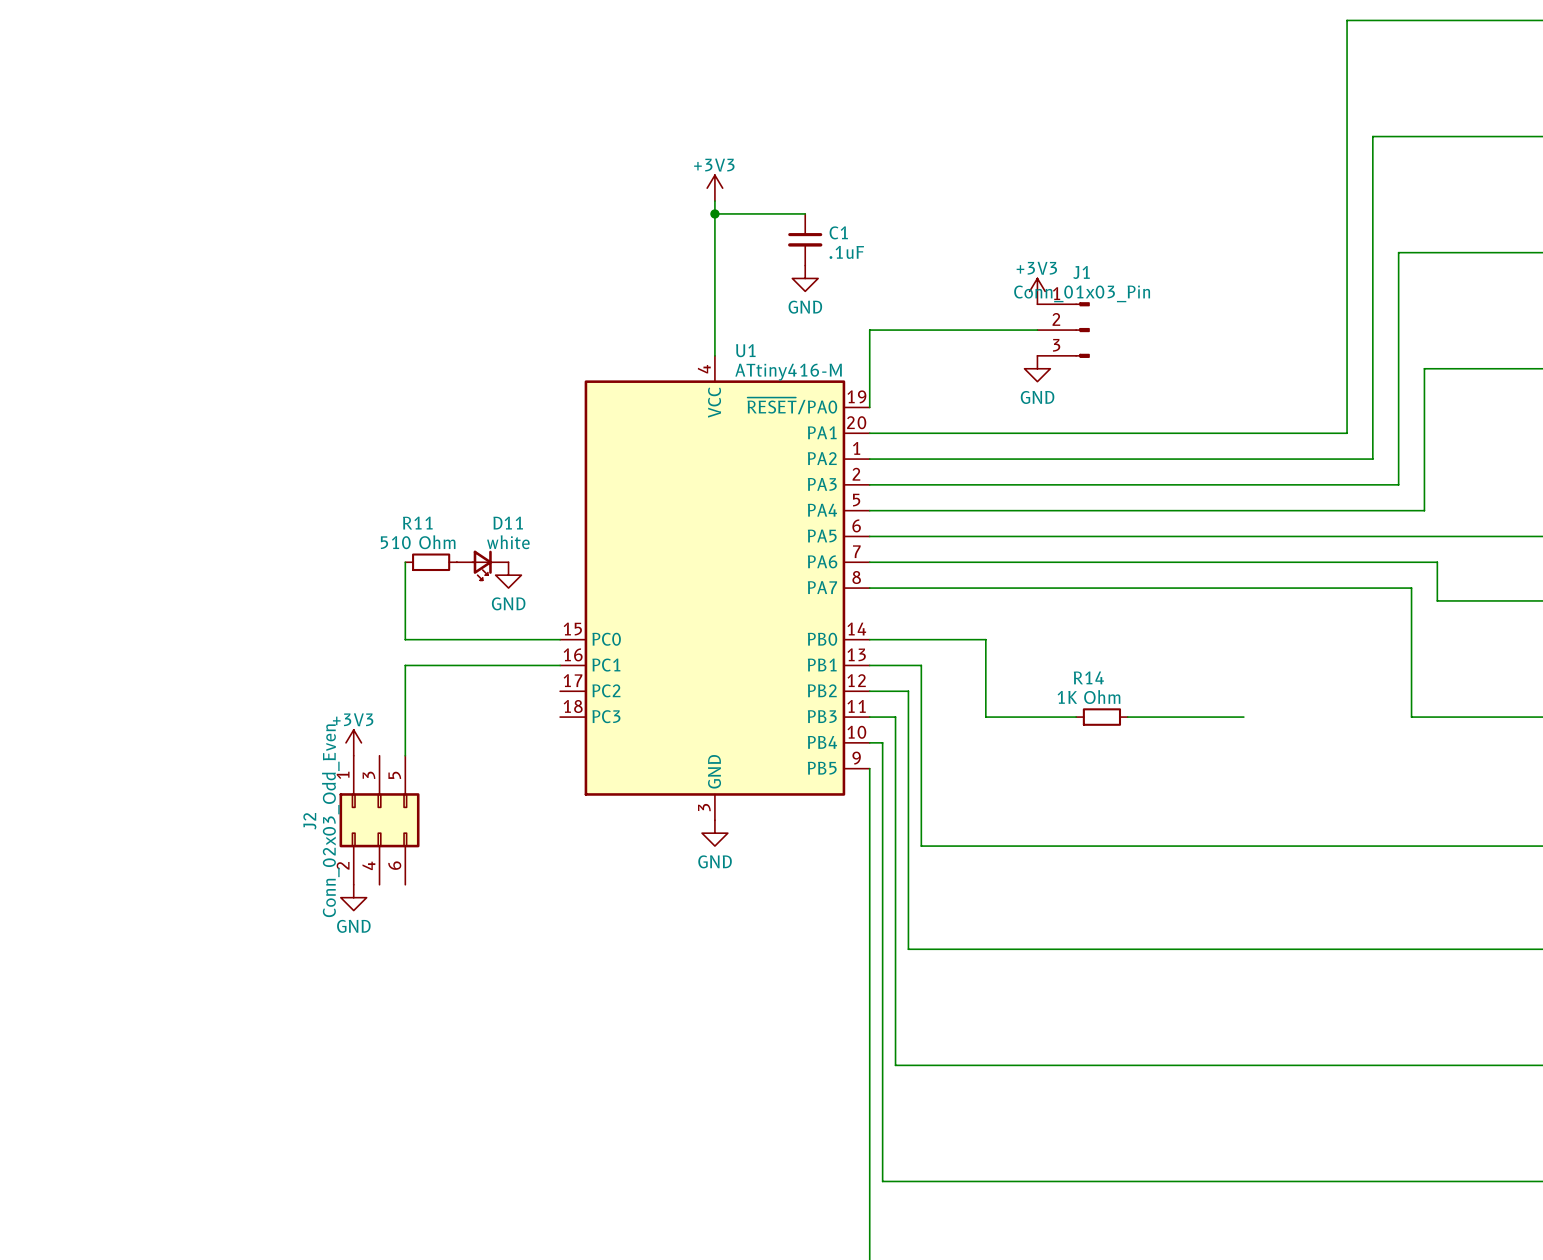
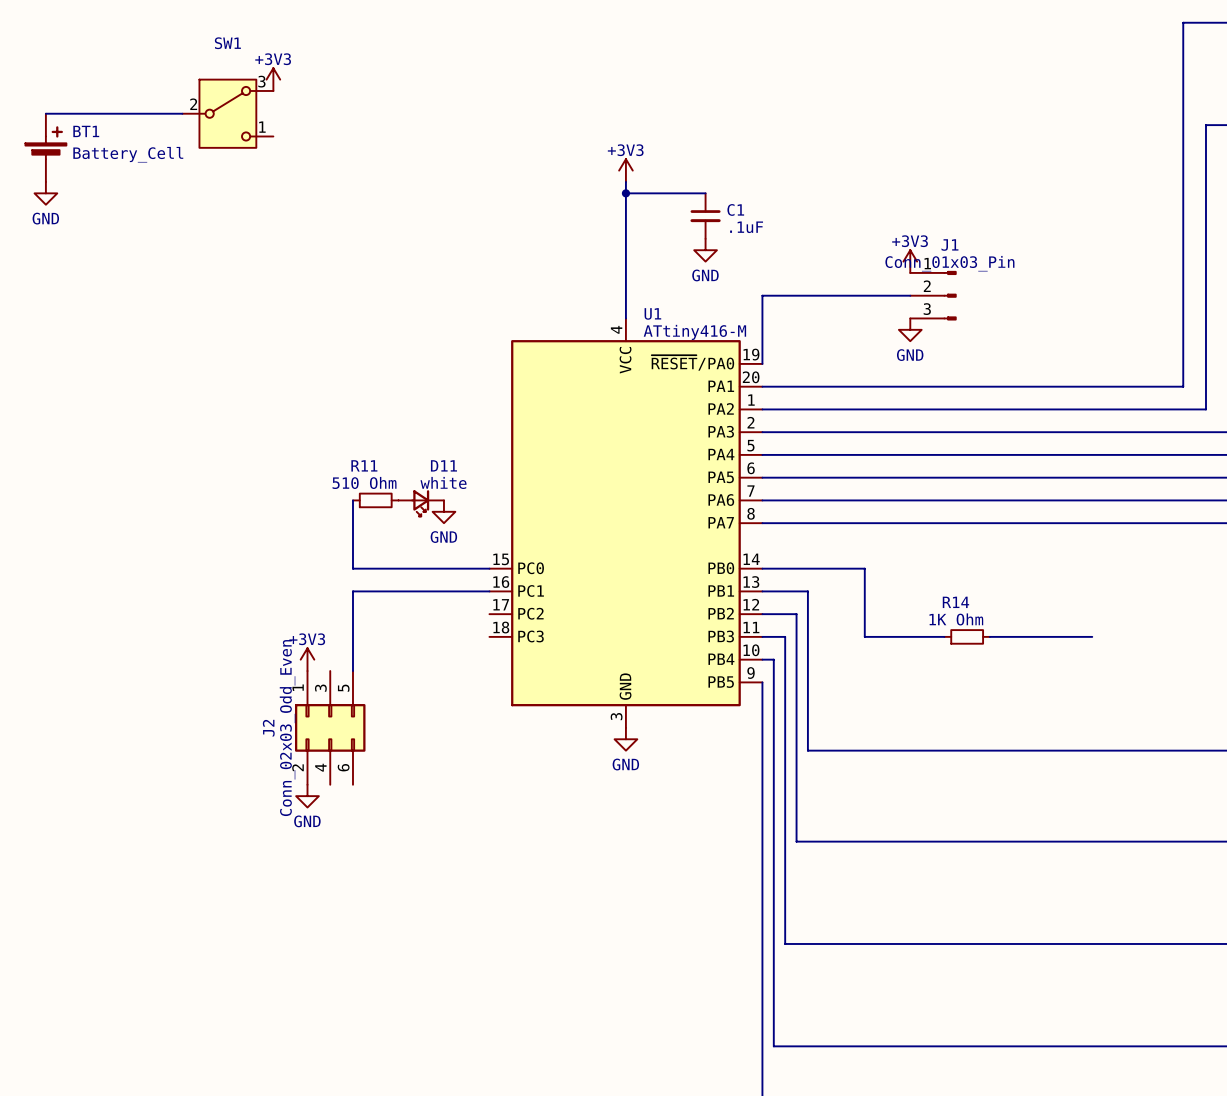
power symbol: none -> +3V3 (273, 79)
wire: none -> (45, 113) (182, 113)
SW1: none -> (227, 113)
BT1: none -> Battery_Cell (45, 147)
power symbol: none -> GND (45, 193)

